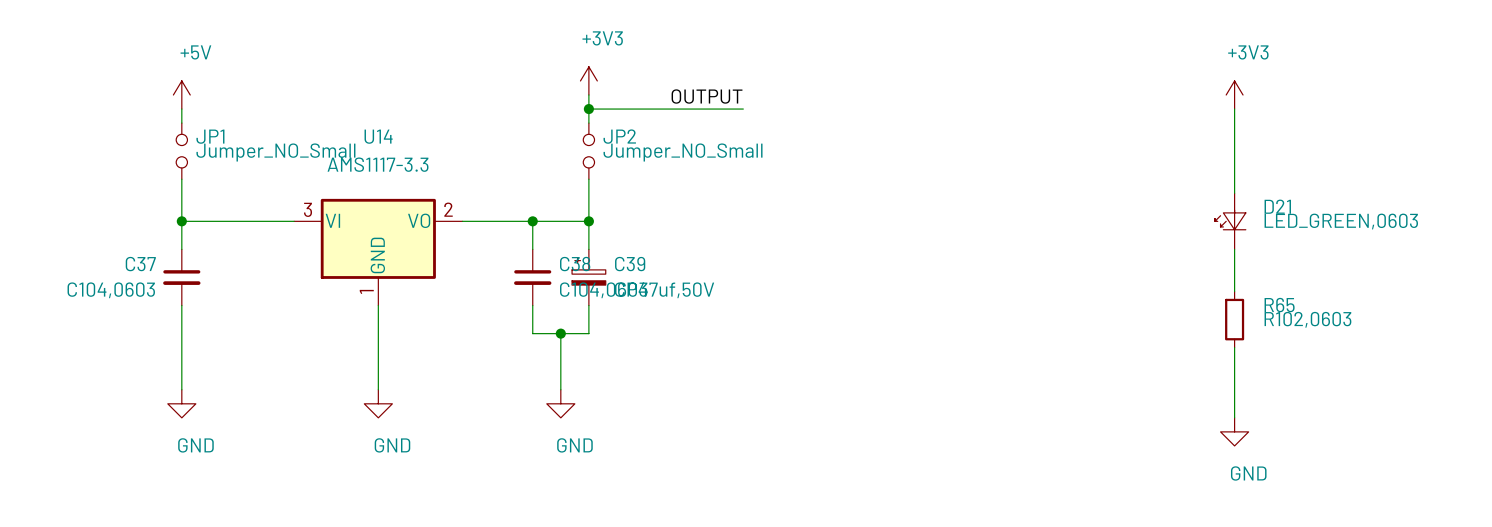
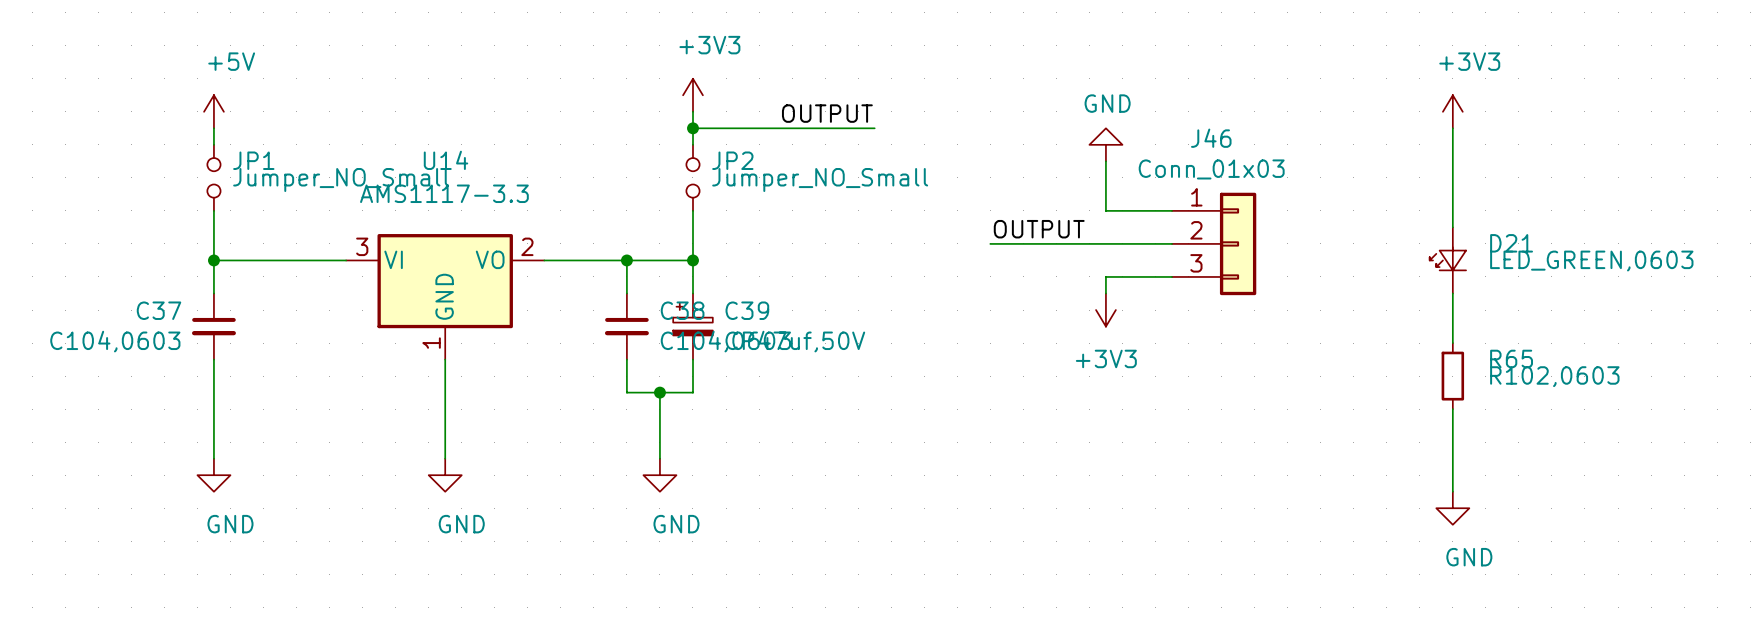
power symbol: none -> GND (1105, 144)
wire: none -> (1105, 161) (1105, 210) (1172, 210)
label: none -> OUTPUT (1039, 229)
wire: none -> (990, 243) (1172, 243)
J46: none -> Conn_01x03 (1214, 243)
wire: none -> (1172, 276) (1105, 276) (1105, 293)
power symbol: none -> +3V3 (1105, 310)

